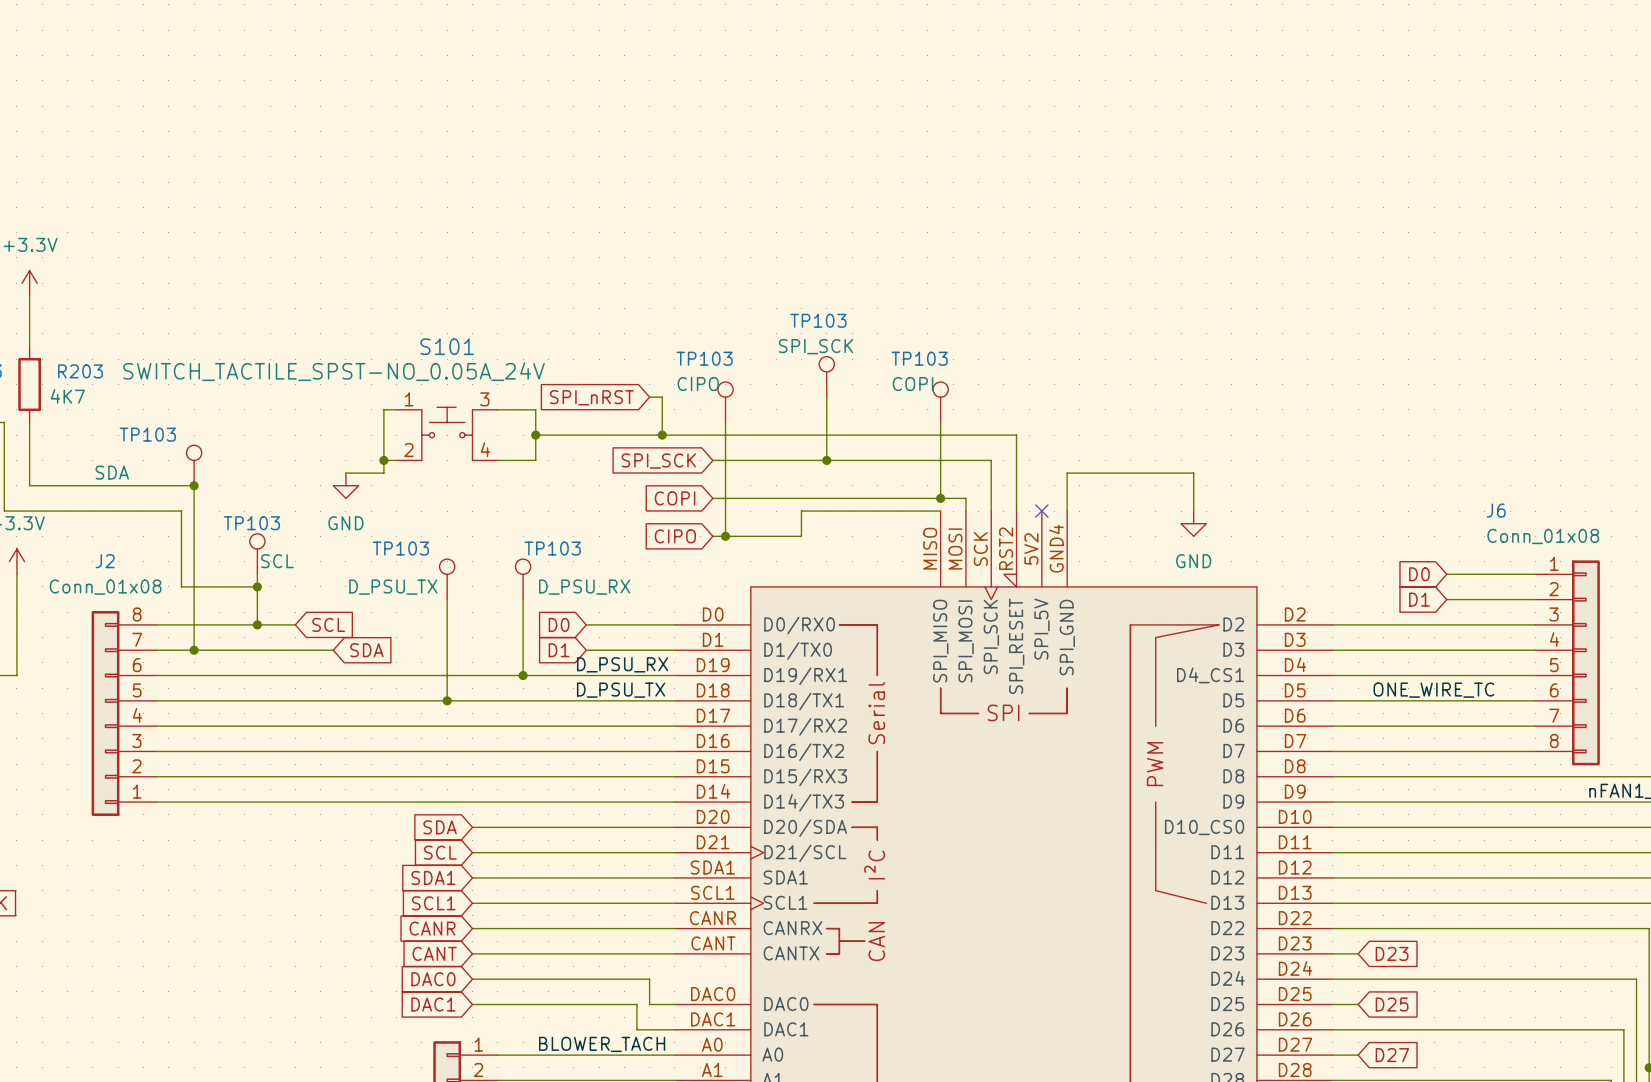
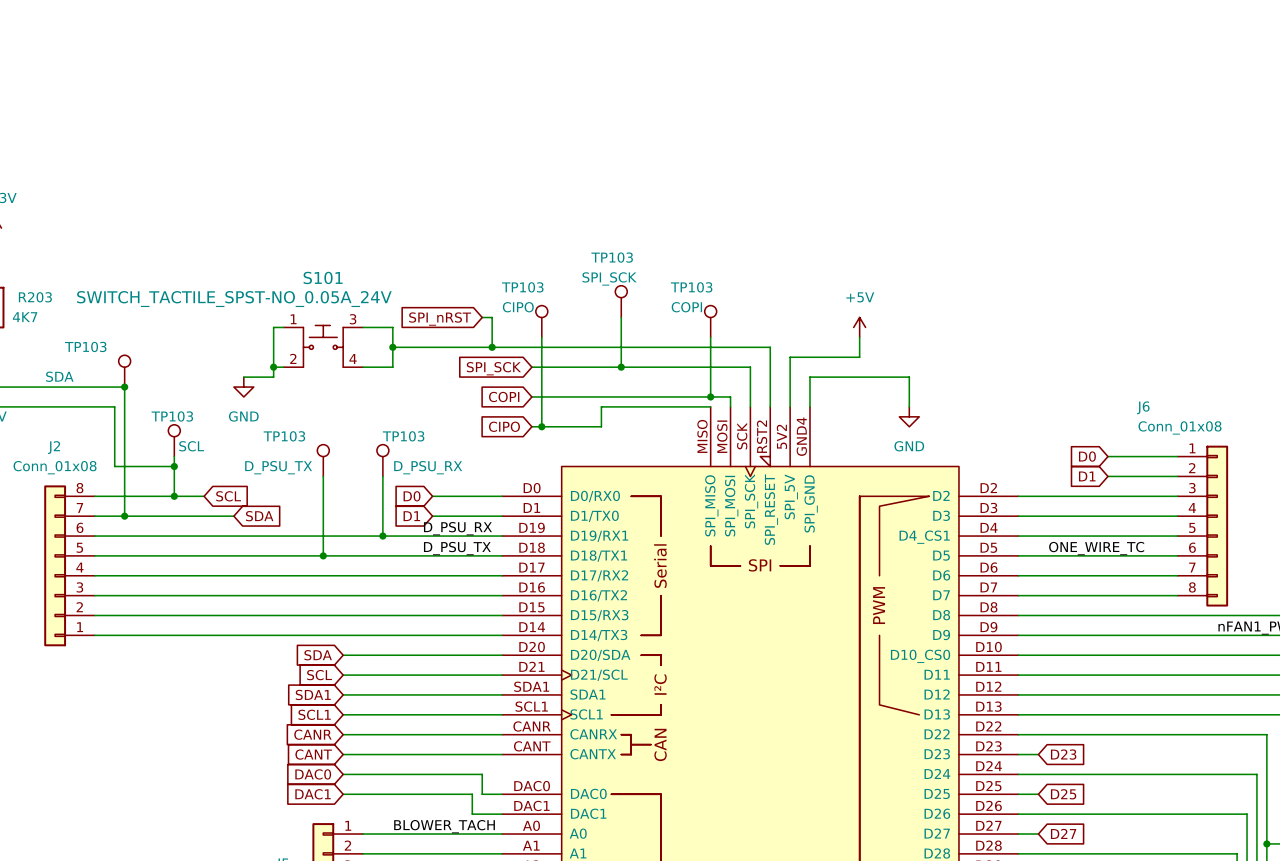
power symbol: none -> +5V (859, 327)
wire: none -> (859, 337) (859, 357) (790, 357) (790, 406)
no-connect mark: (1041, 511) -> none

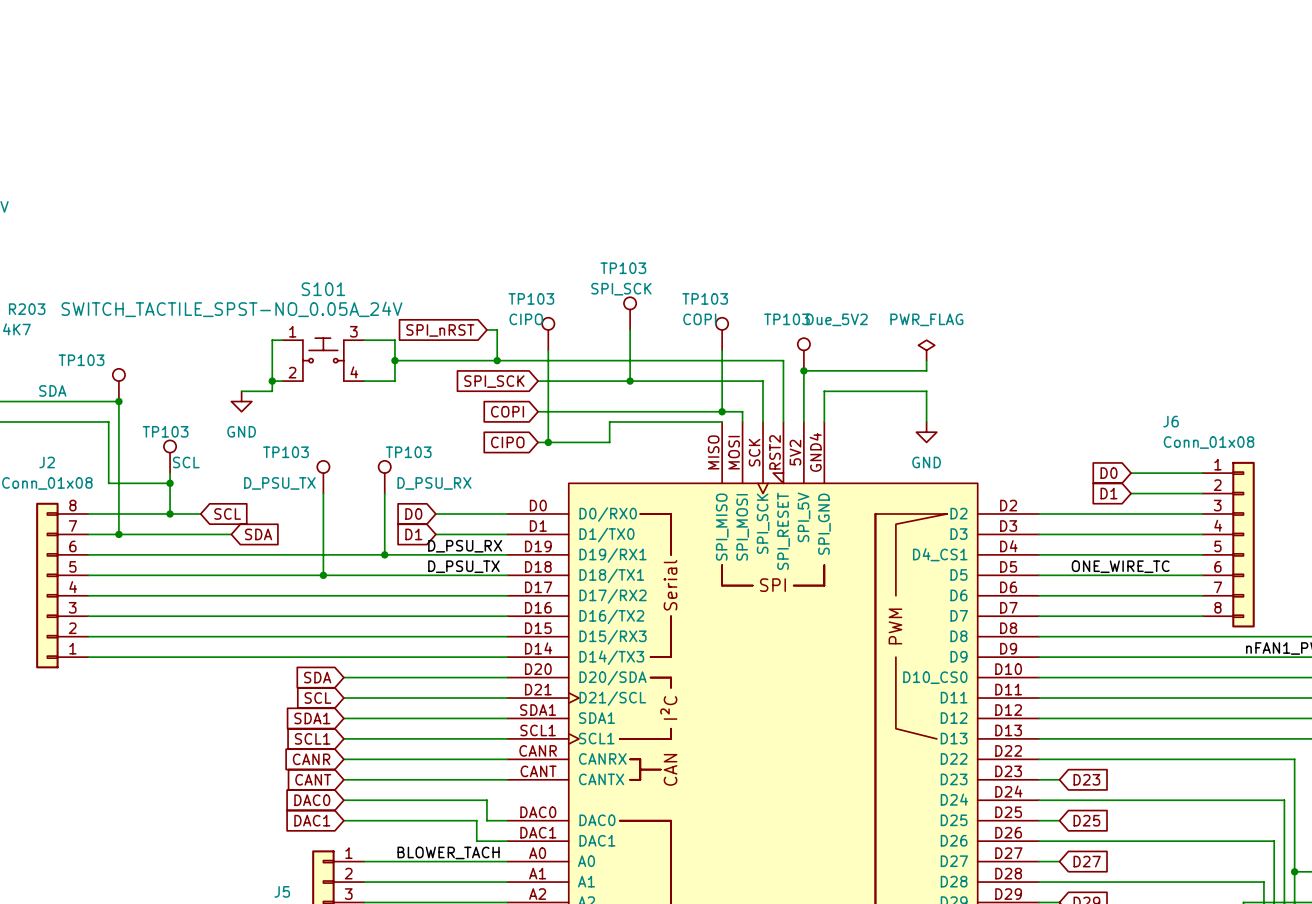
power symbol: +5V (859, 327) -> none
wire: (859, 337) (859, 357) -> (926, 360) (926, 370) (875, 370)
power symbol: none -> PWR_FLAG (926, 350)
TP103: none -> Due_5V2 (803, 354)
junction: none -> (803, 370)

